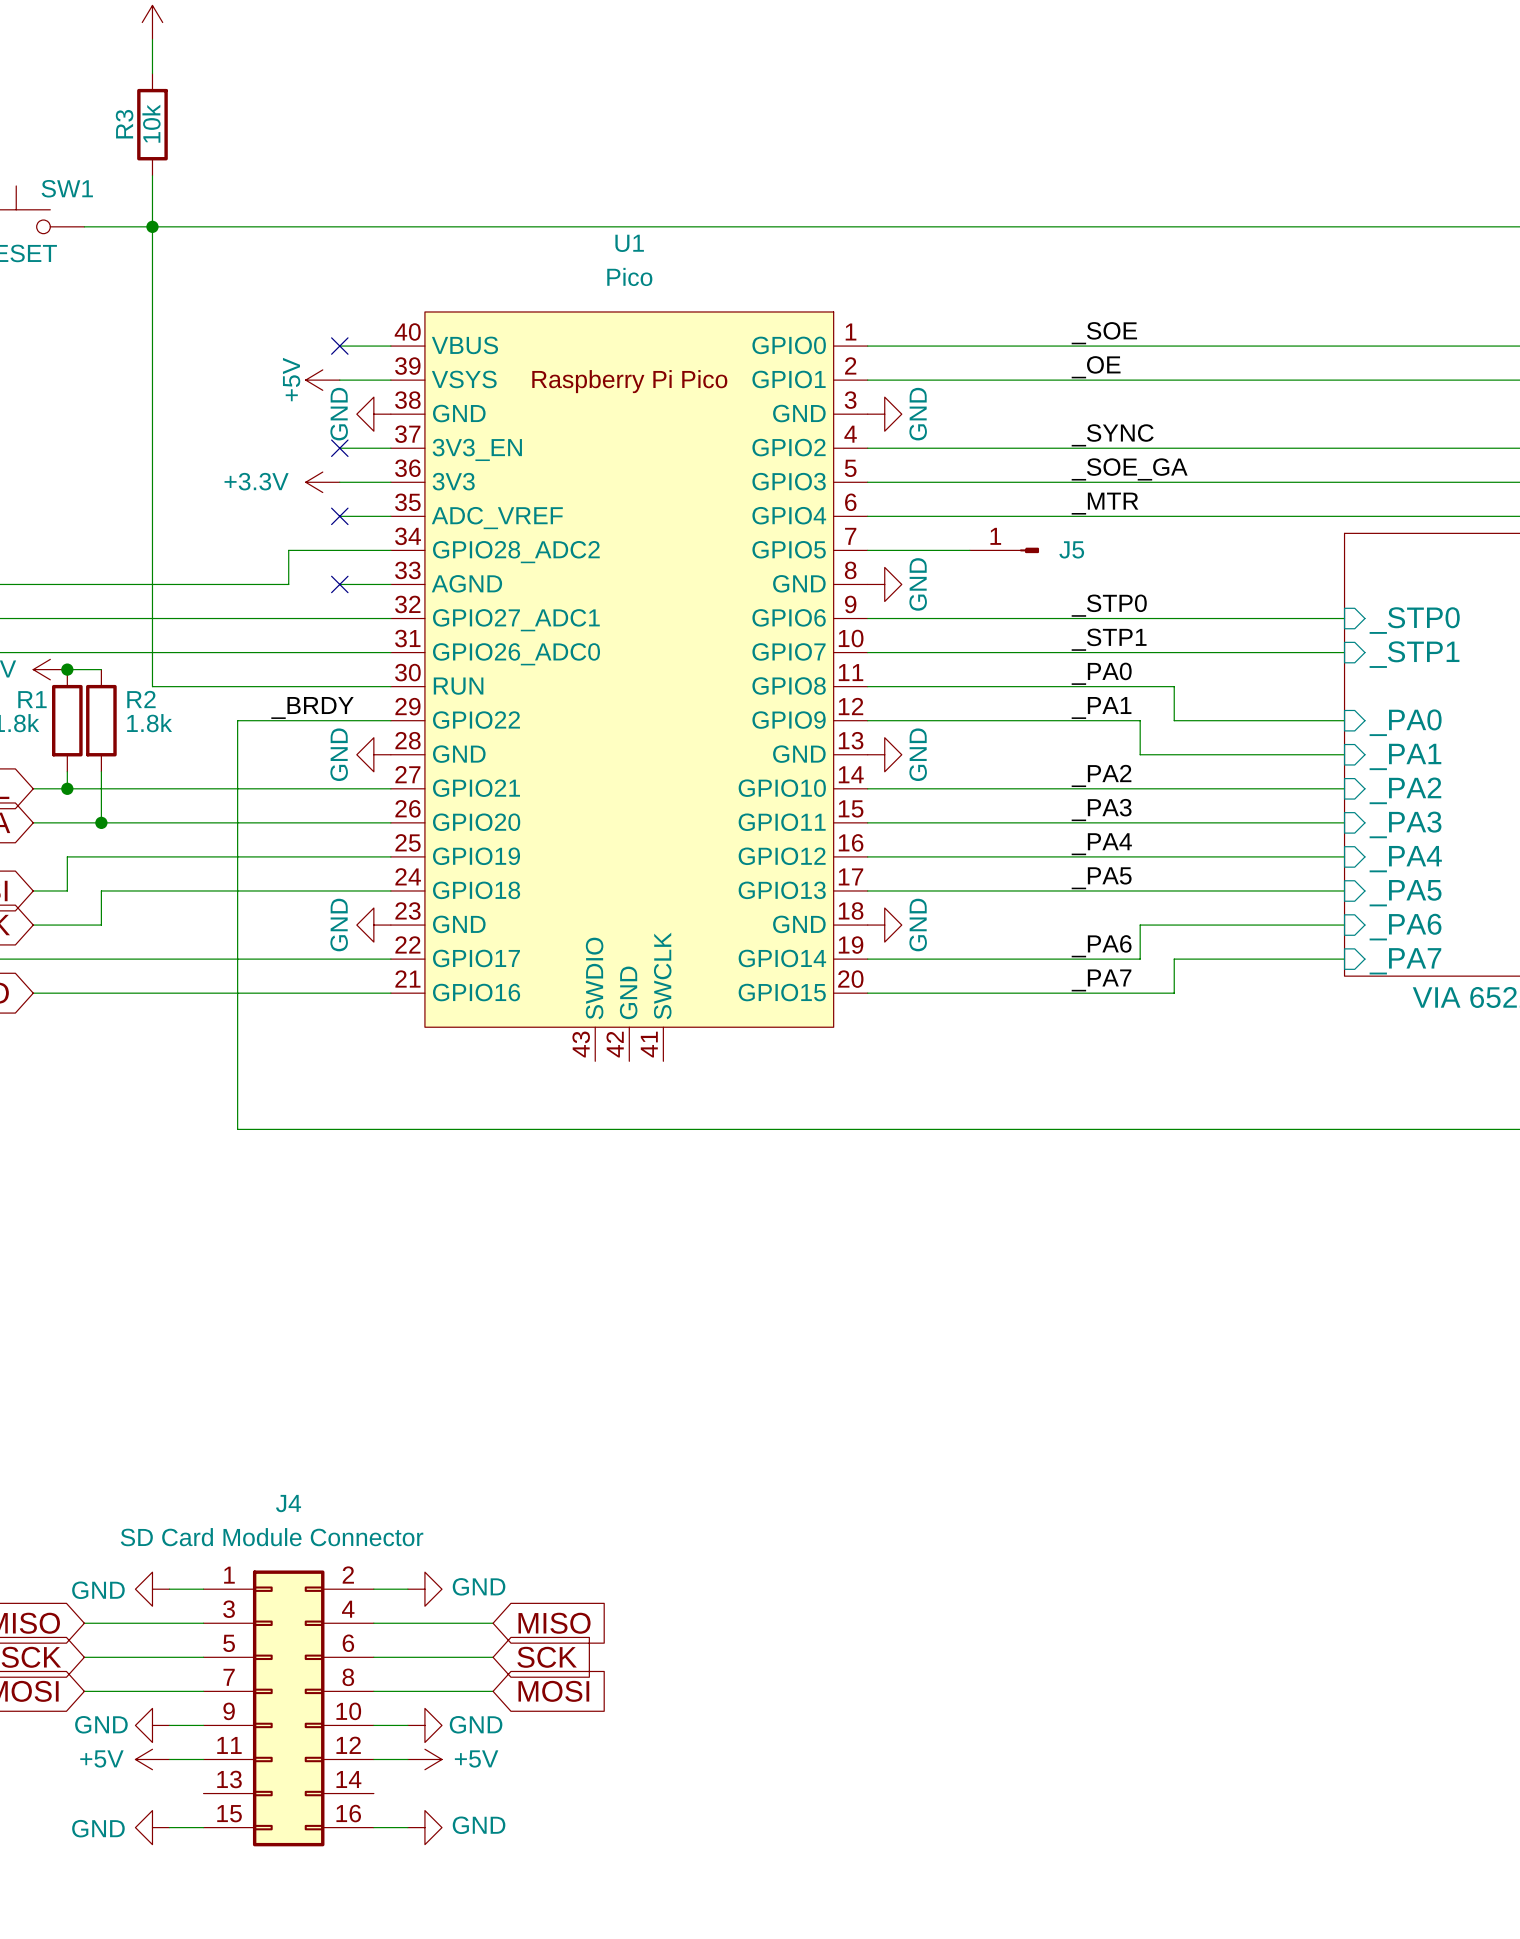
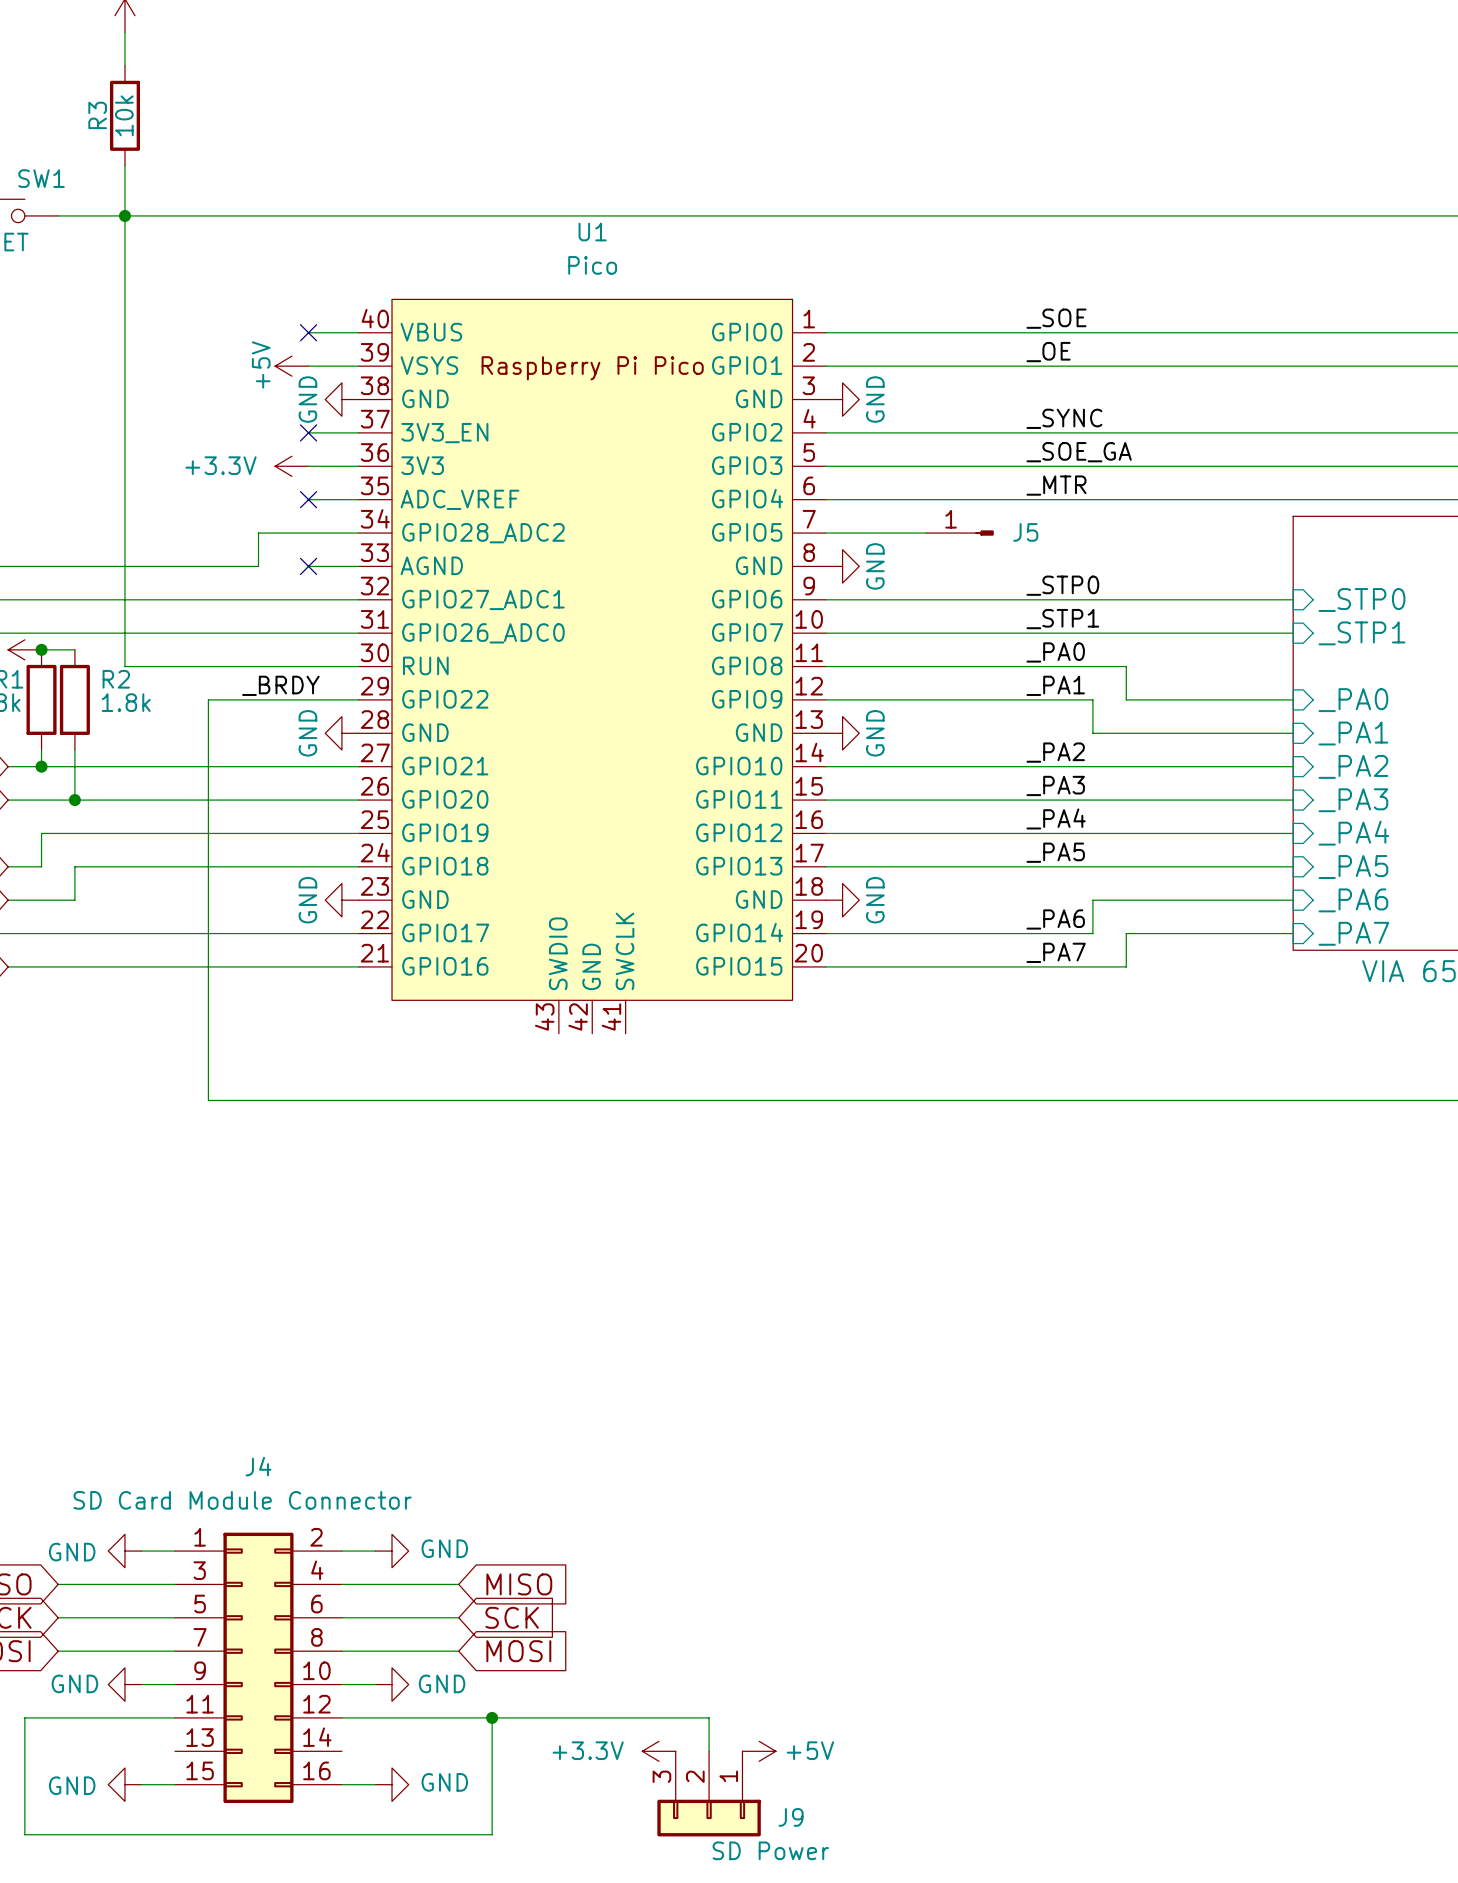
power symbol: +5V (152, 1759) -> none
wire: none -> (141, 1717) (24, 1717) (24, 1834) (492, 1834) (492, 1717)
wire: none -> (375, 1717) (709, 1717) (709, 1751)
power symbol: +5V (424, 1759) -> none
junction: none -> (492, 1717)
power symbol: none -> +3.3V (659, 1751)
power symbol: none -> +5V (759, 1751)
J9: none -> SD Power (709, 1793)

